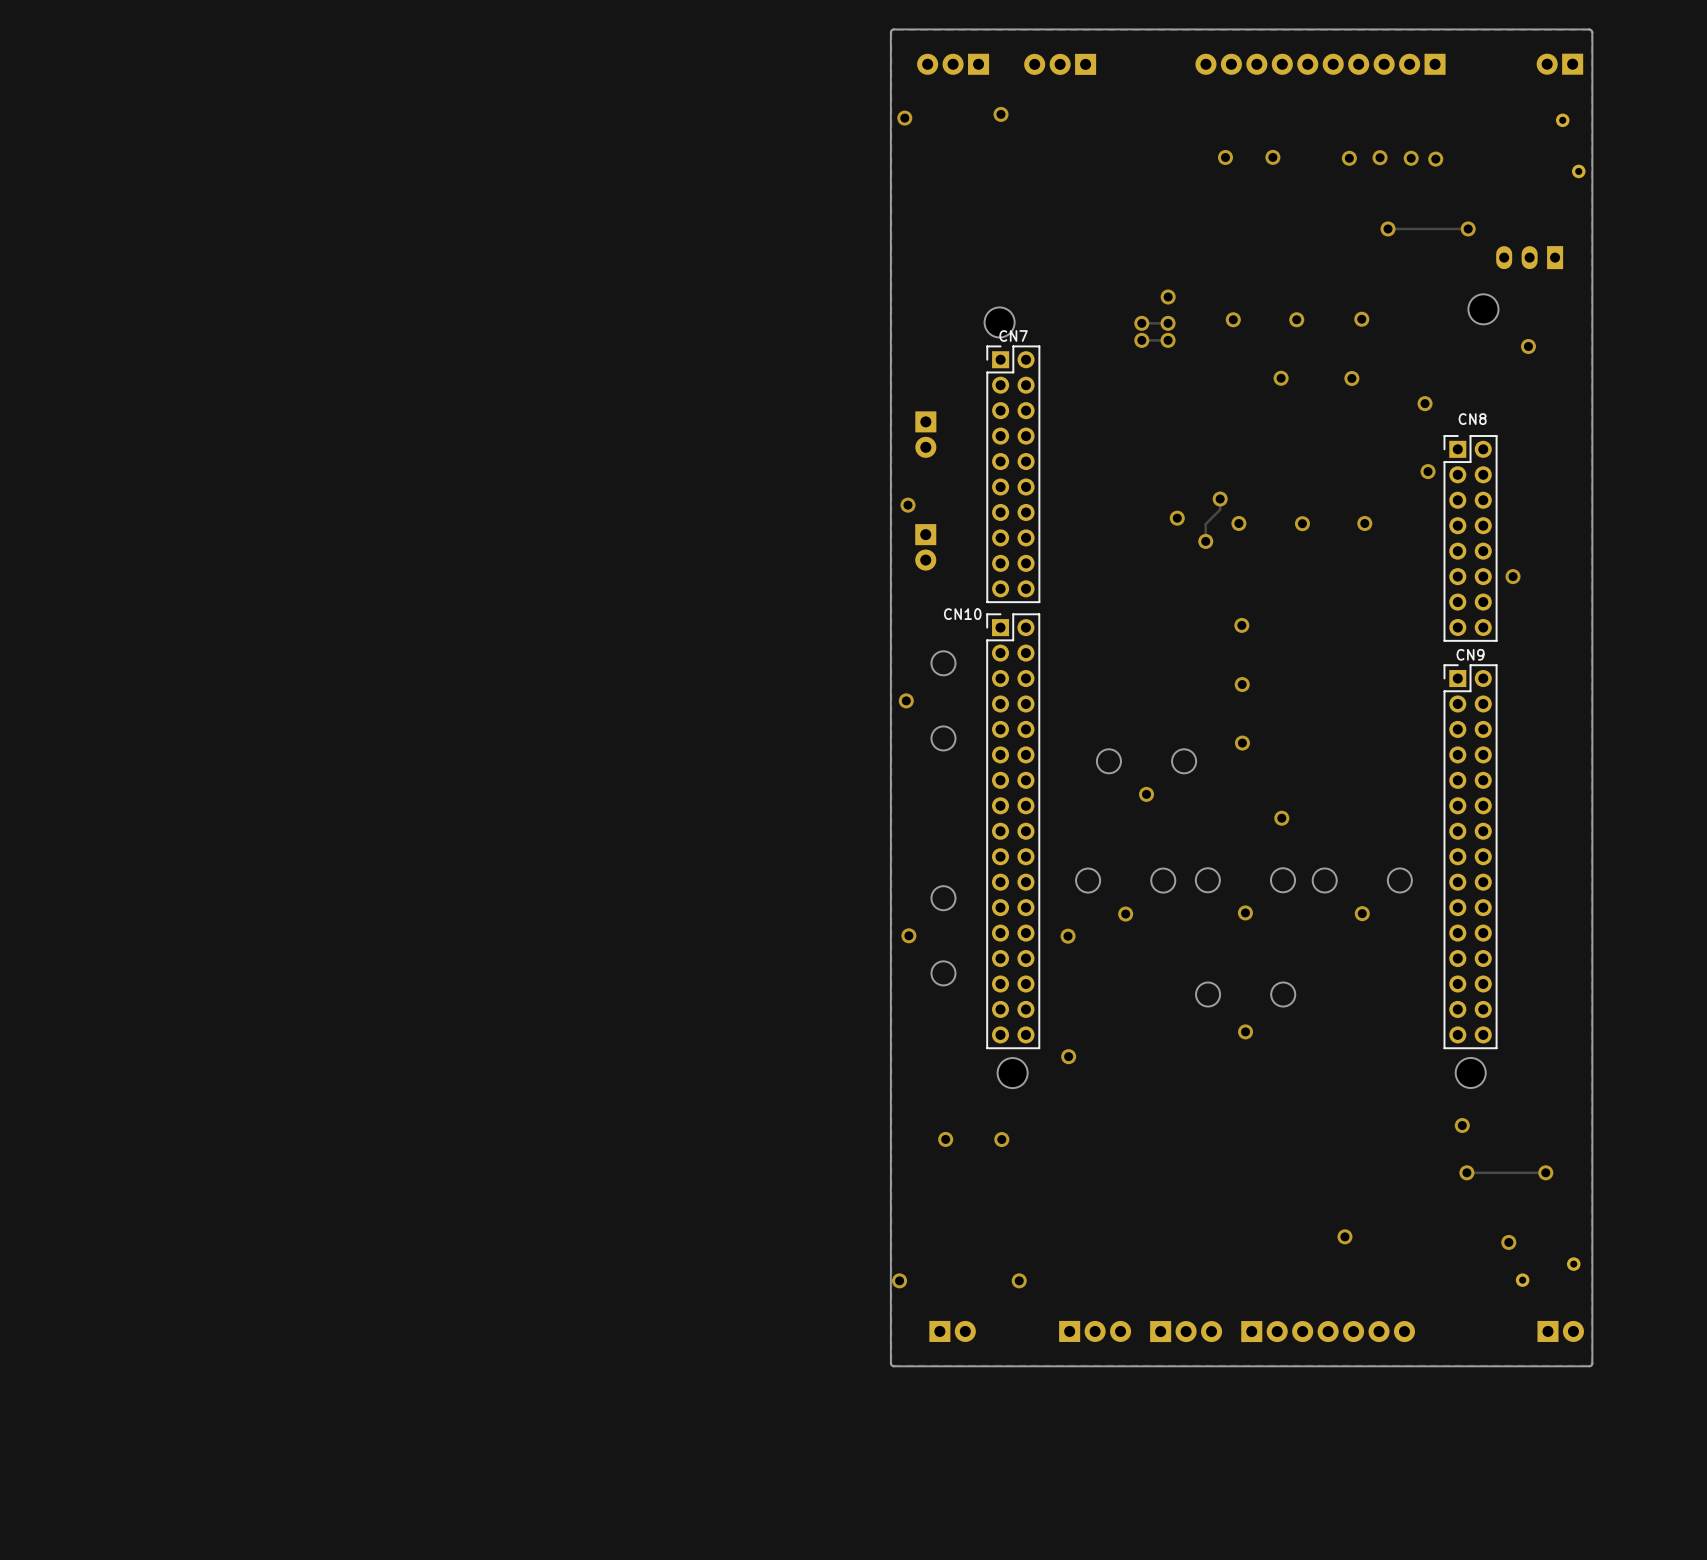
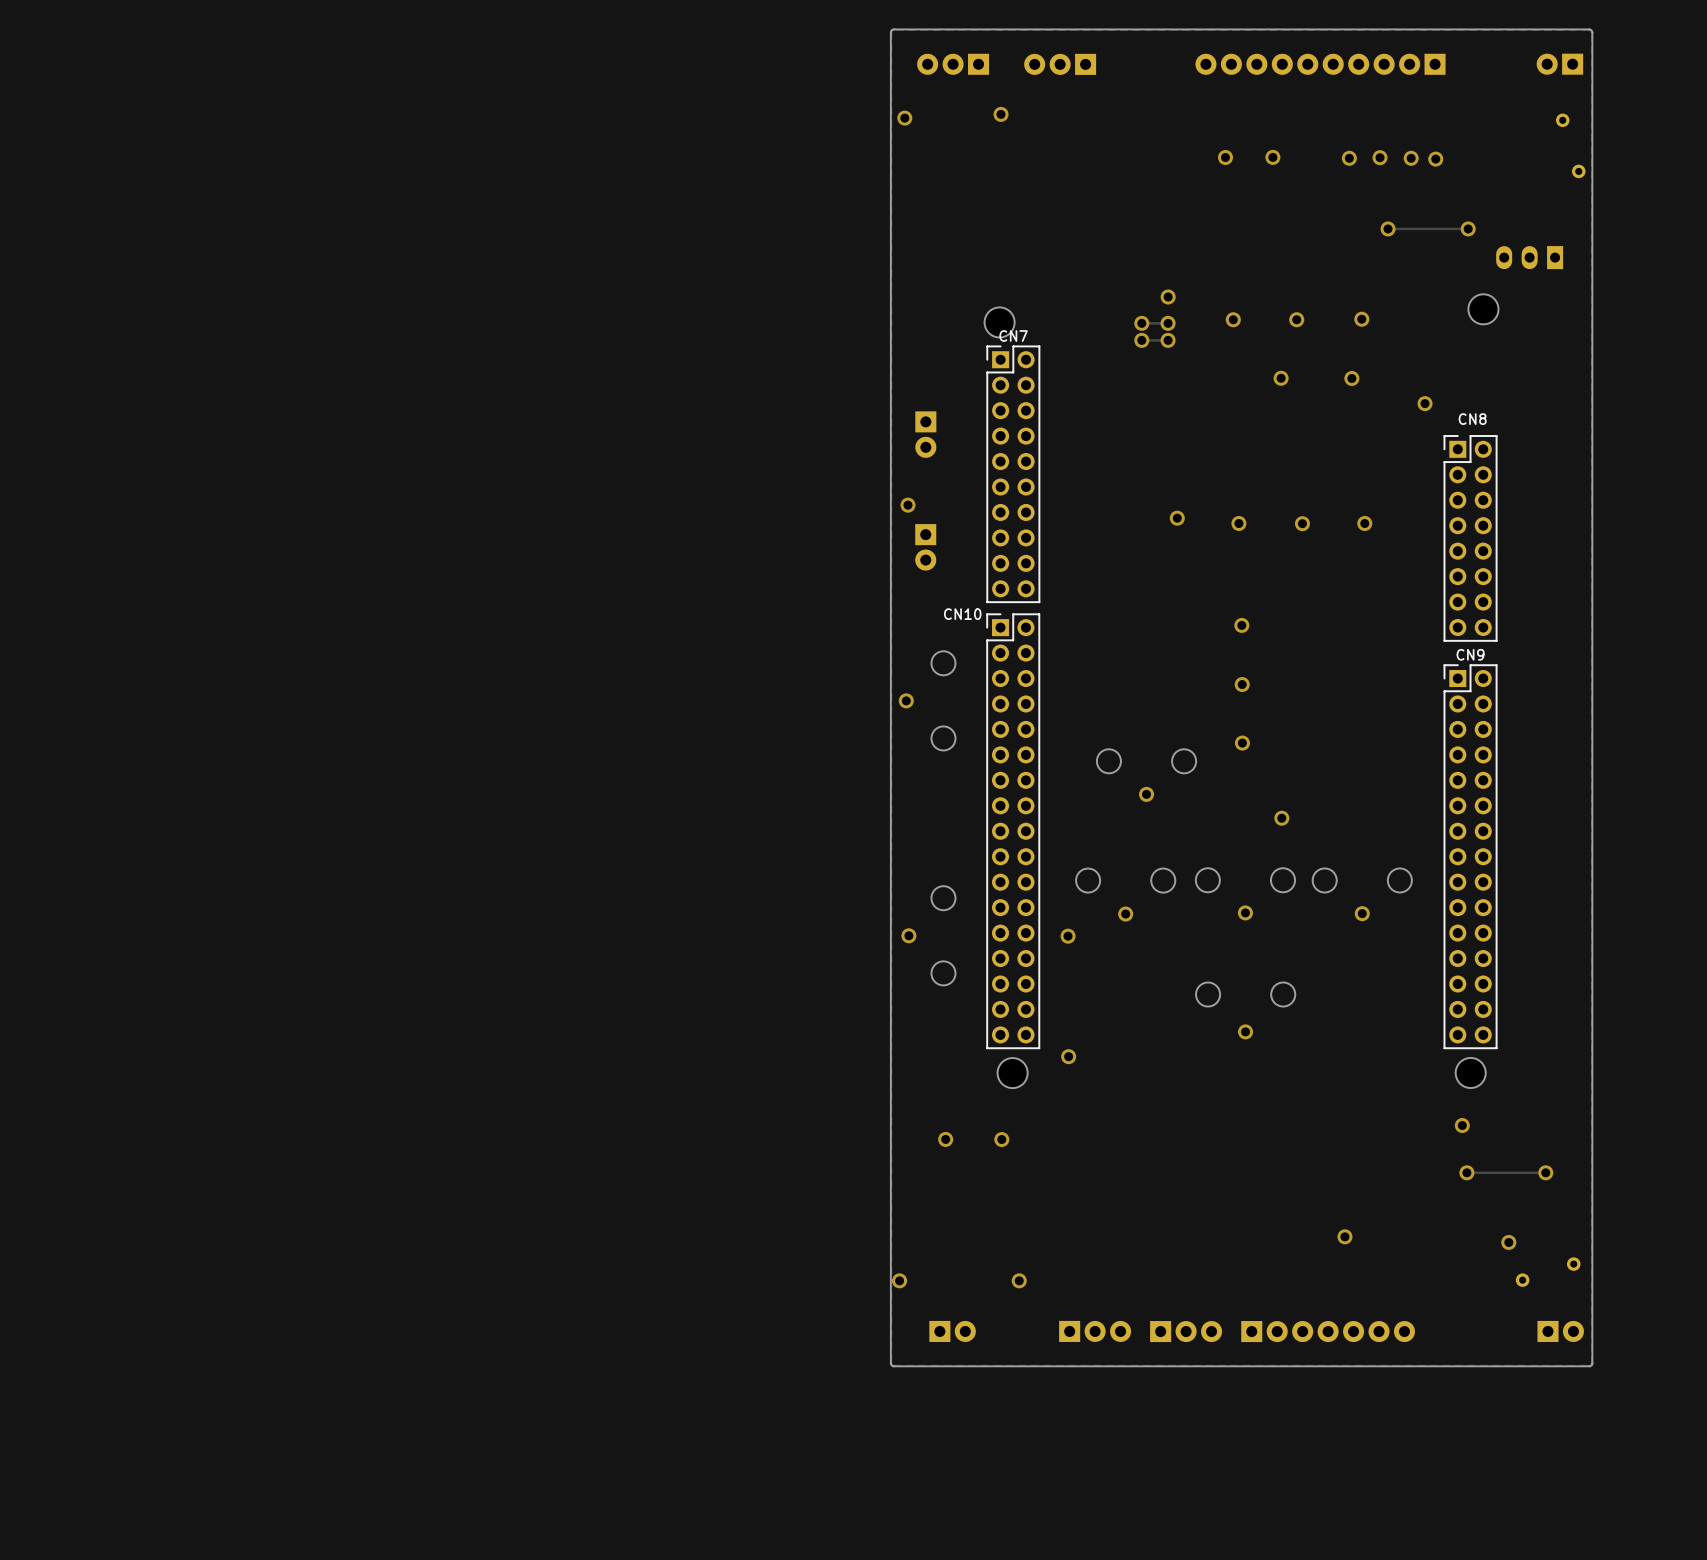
via: (1528, 346) -> none
via: (1428, 471) -> none
track: (1220, 499) (1220, 509) (1205, 524) (1205, 541) -> none
via: (1220, 499) -> none
via: (1205, 541) -> none
via: (1513, 576) -> none

